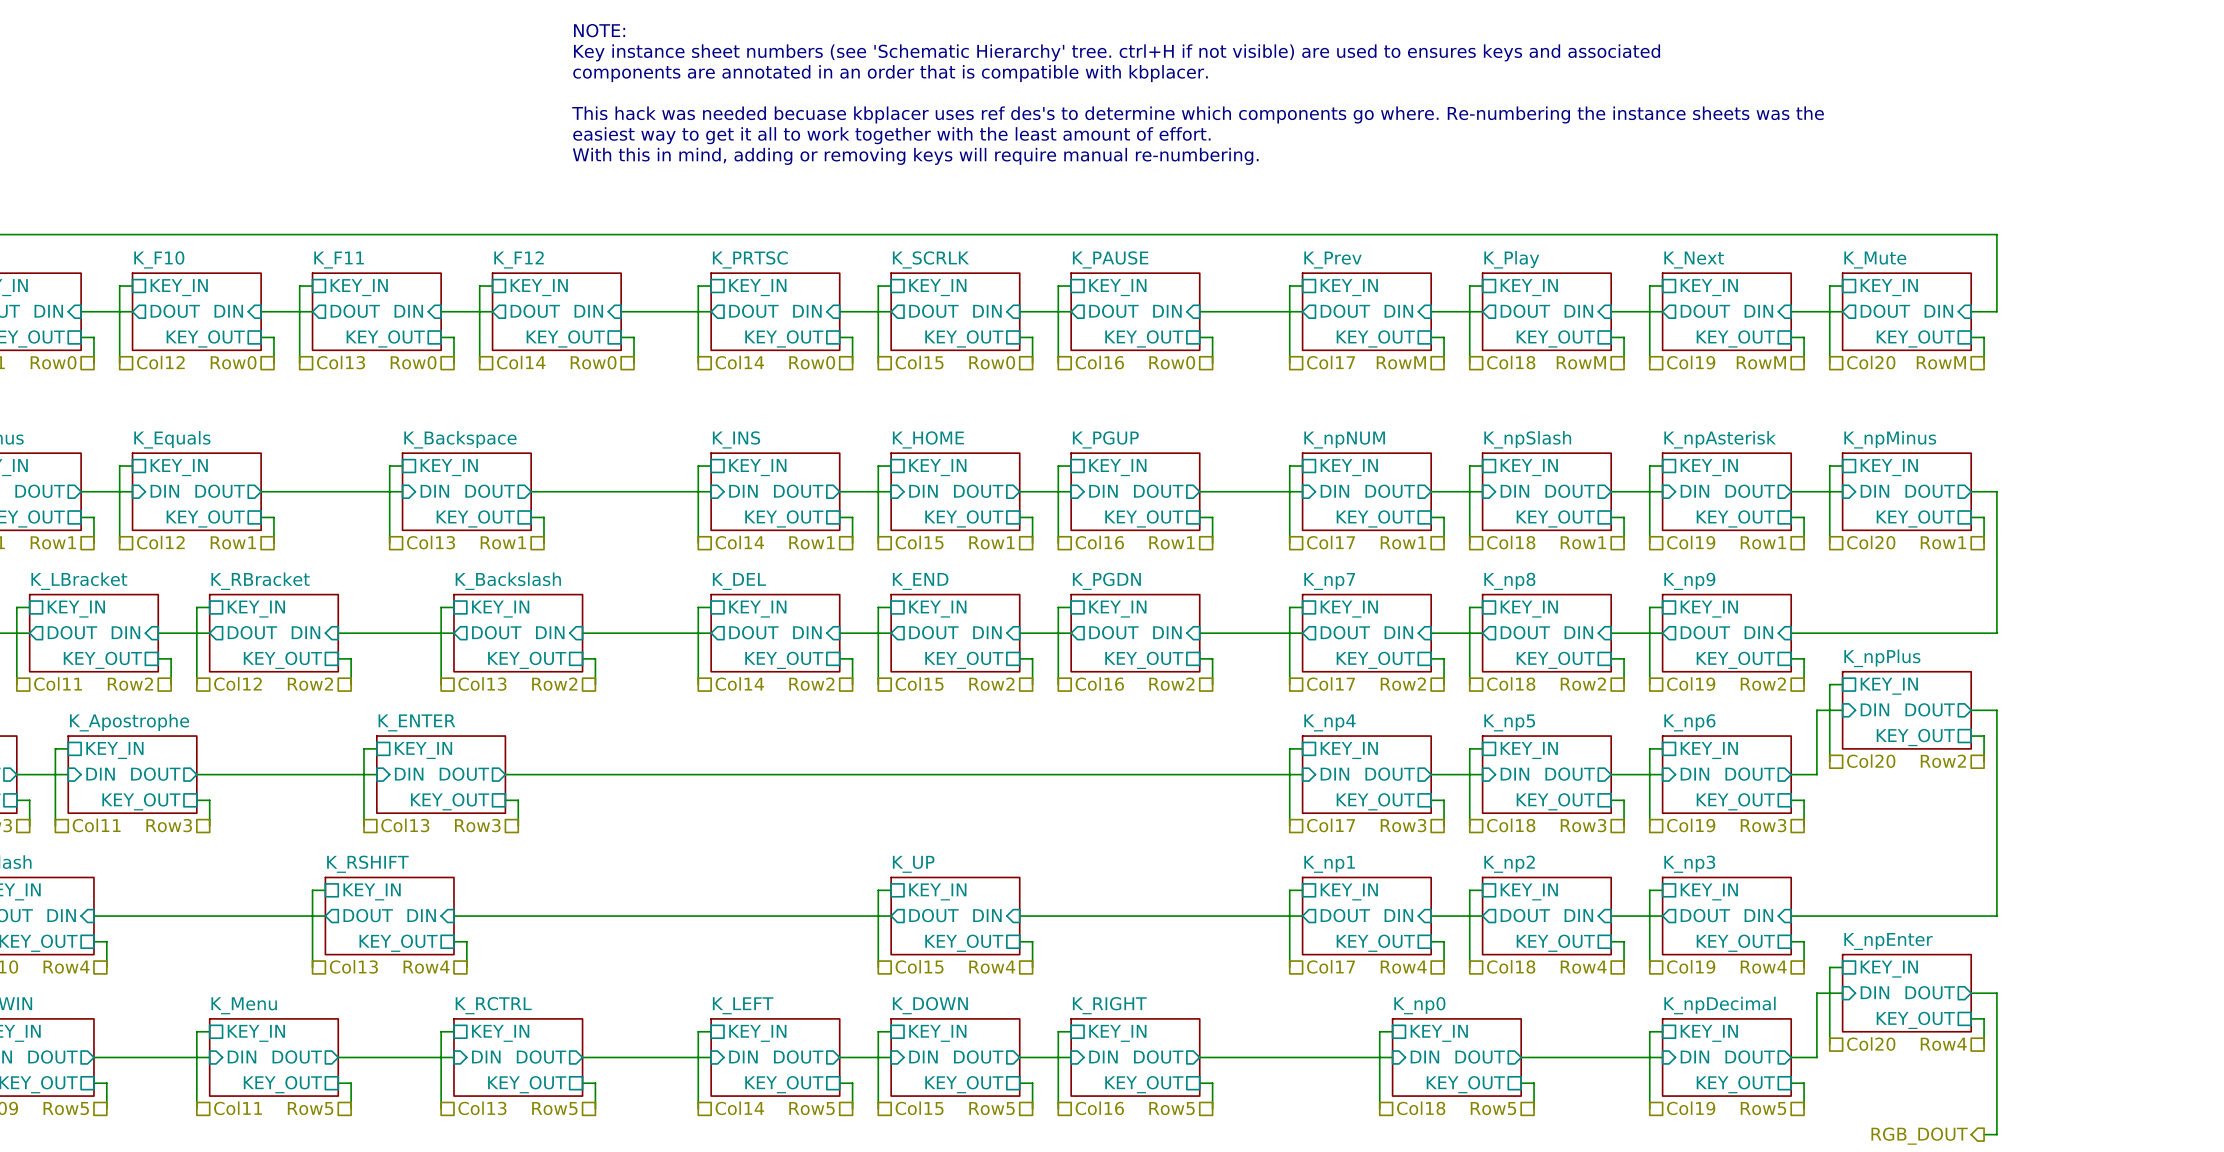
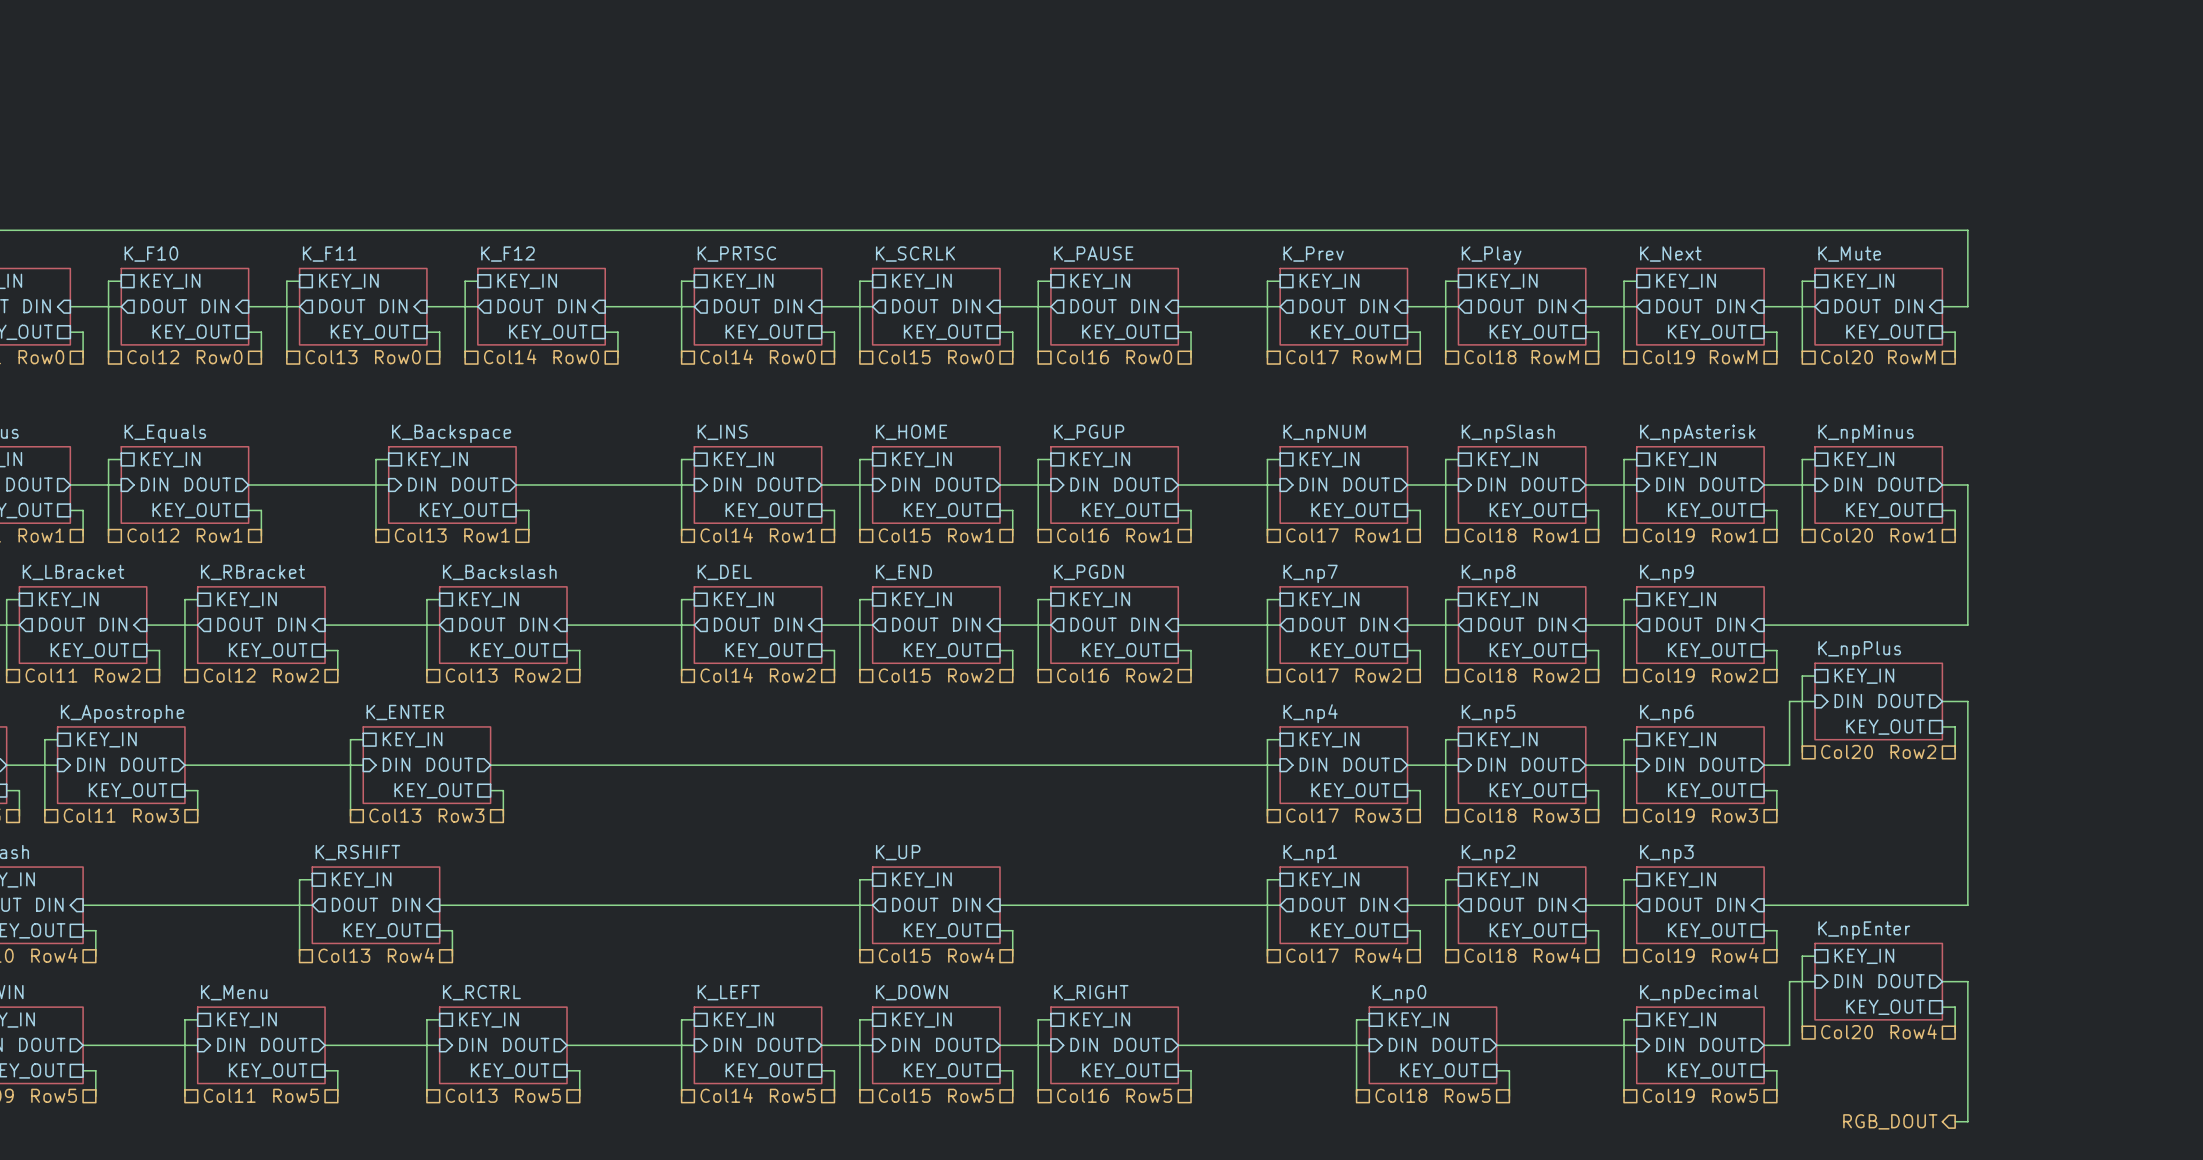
text: NOTE: (599, 30) -> none
text: Key instance sheet numbers (see 'Schematic Hierarchy' tree. ctrl+H if not visible) are used to ensures keys and associated (1117, 52) -> none
text: components are annotated in an order that is compatible with kbplacer. (890, 73) -> none
text: This hack was needed becuase kbplacer uses ref des's to determine which components go where. Re-numbering the instance sheets was the (1198, 114) -> none
text: easiest way to get it all to work together with the least amount of effort. (891, 135) -> none
text: With this in mind, adding or removing keys will require manual re-numbering. (915, 156) -> none

